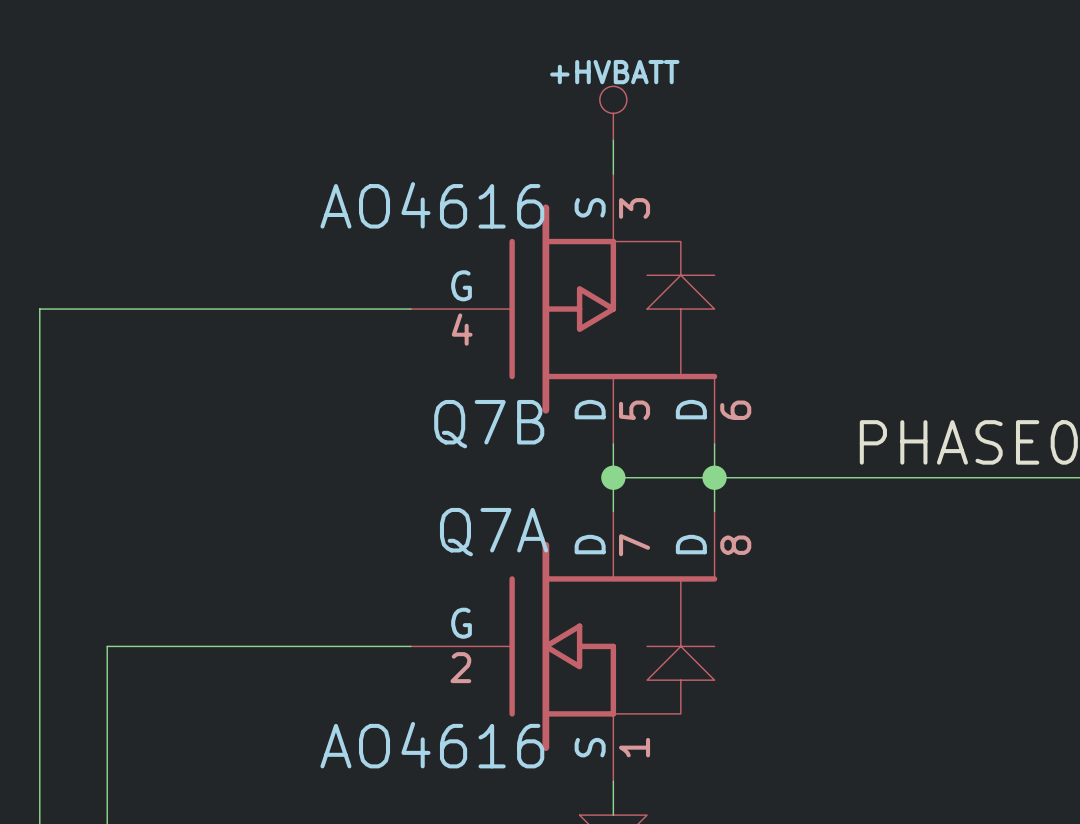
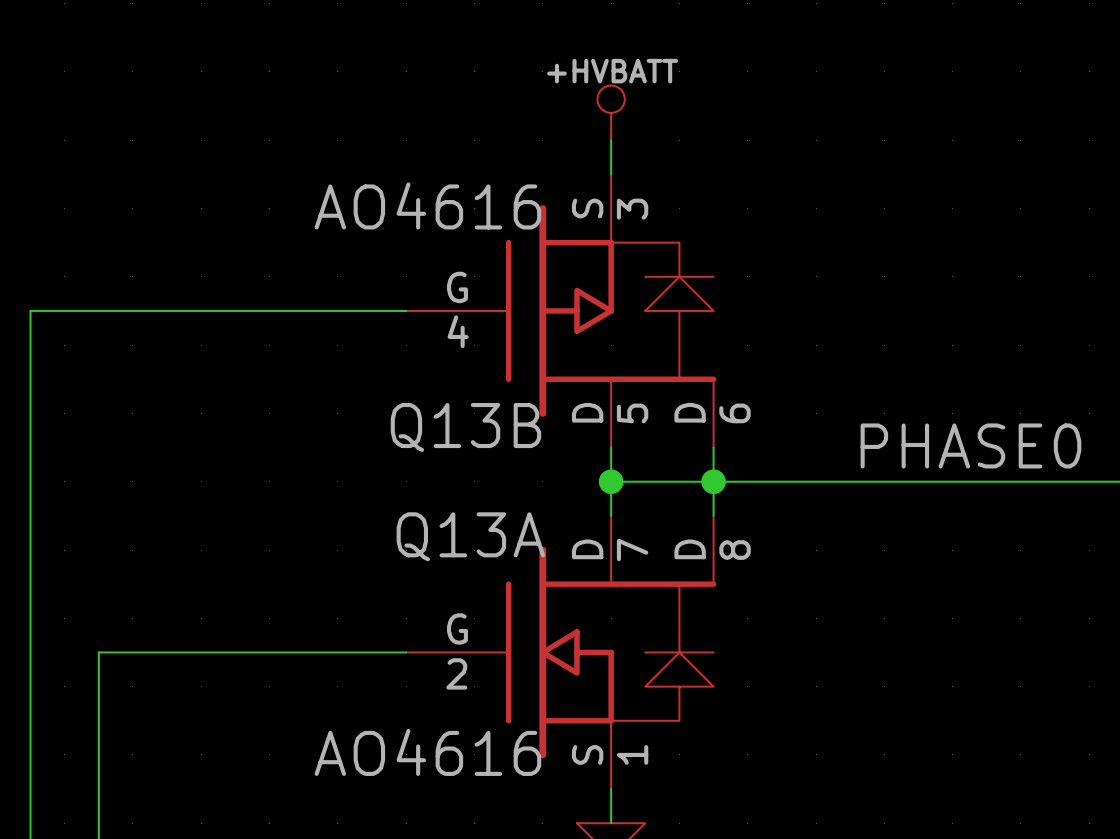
Q7B name: Q7B (489, 424) -> Q13B (465, 427)
Q7A name: Q7A (494, 532) -> Q13A (470, 536)

